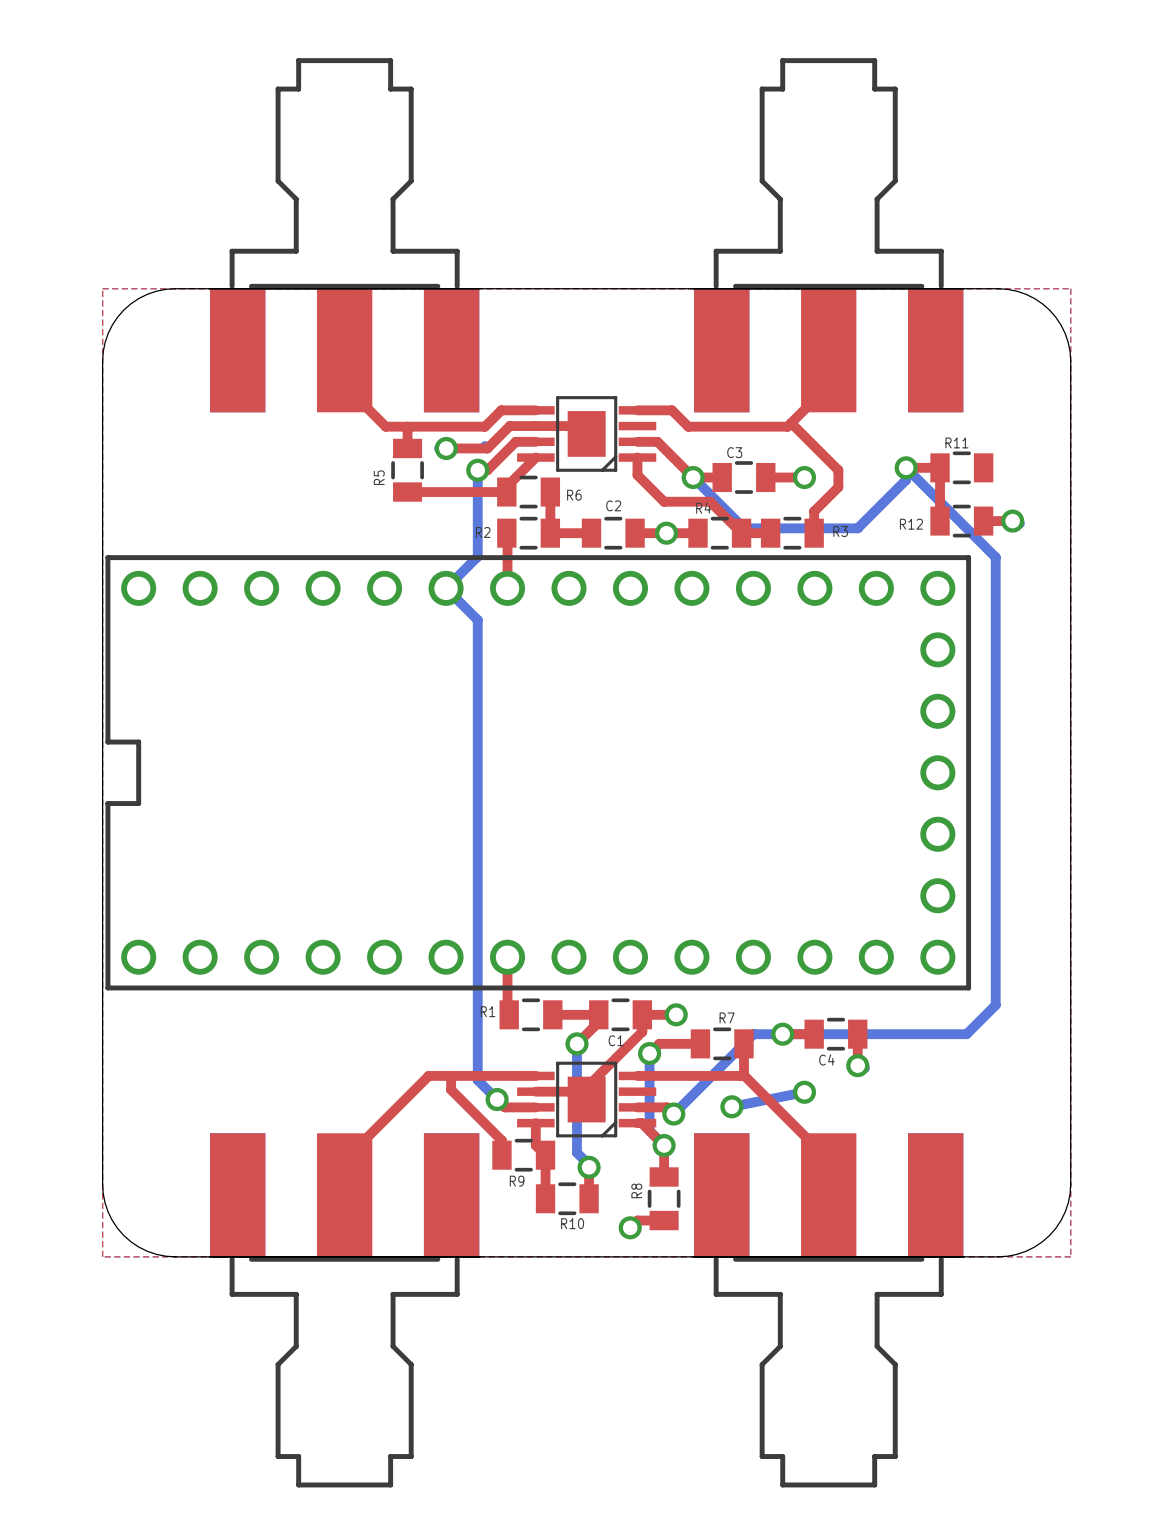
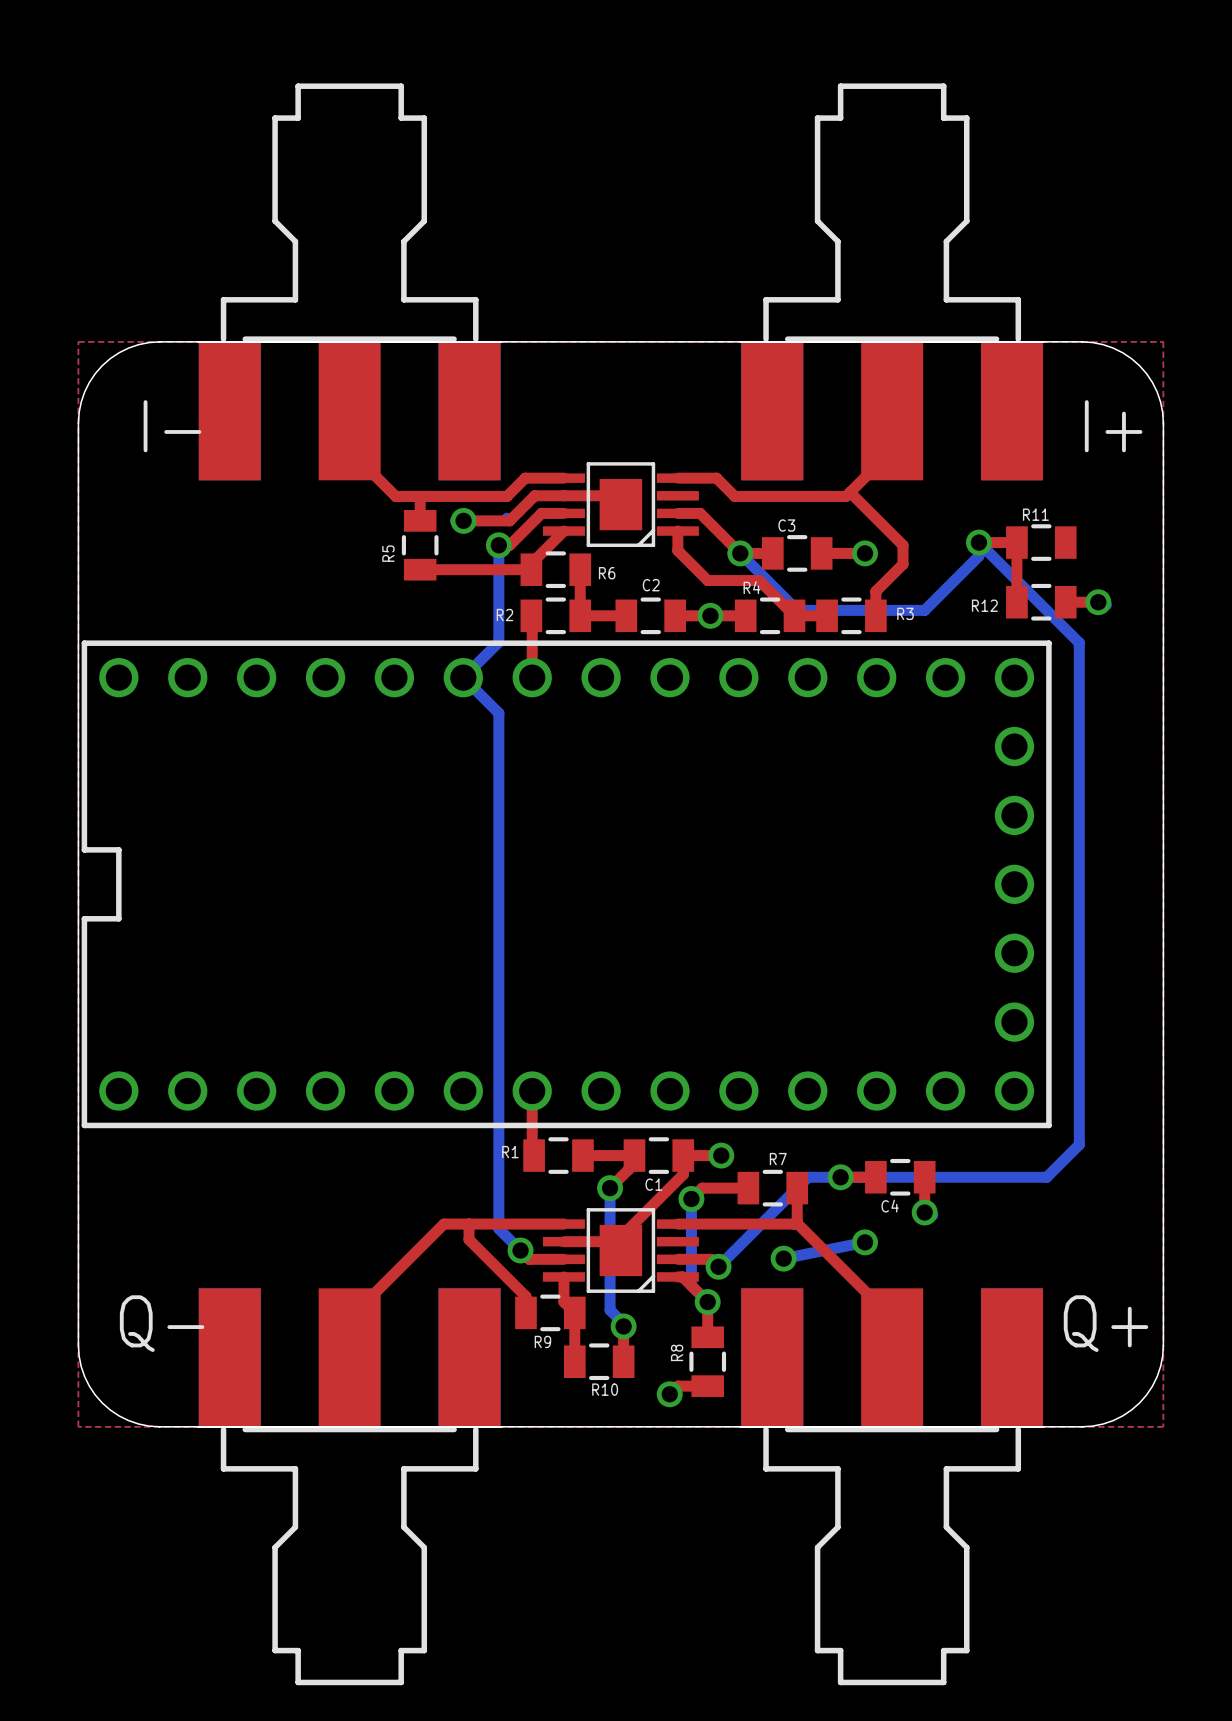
text: none -> I- (172, 426)
text: none -> I+ (1113, 426)
text: none -> Q- (162, 1323)
text: none -> Q+ (1106, 1323)

